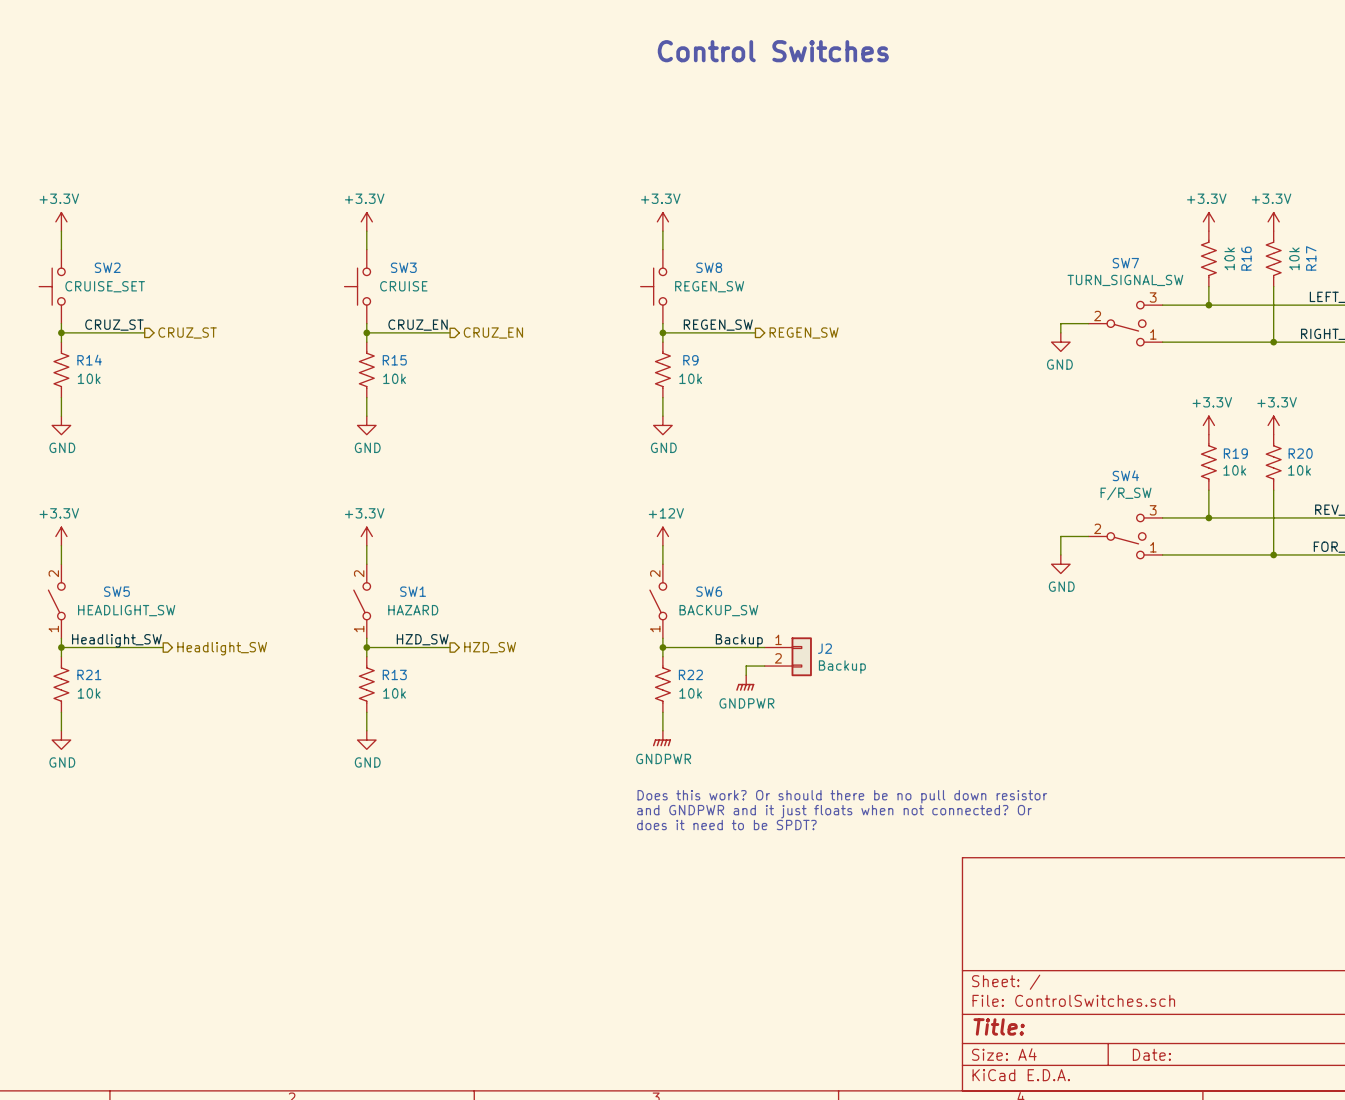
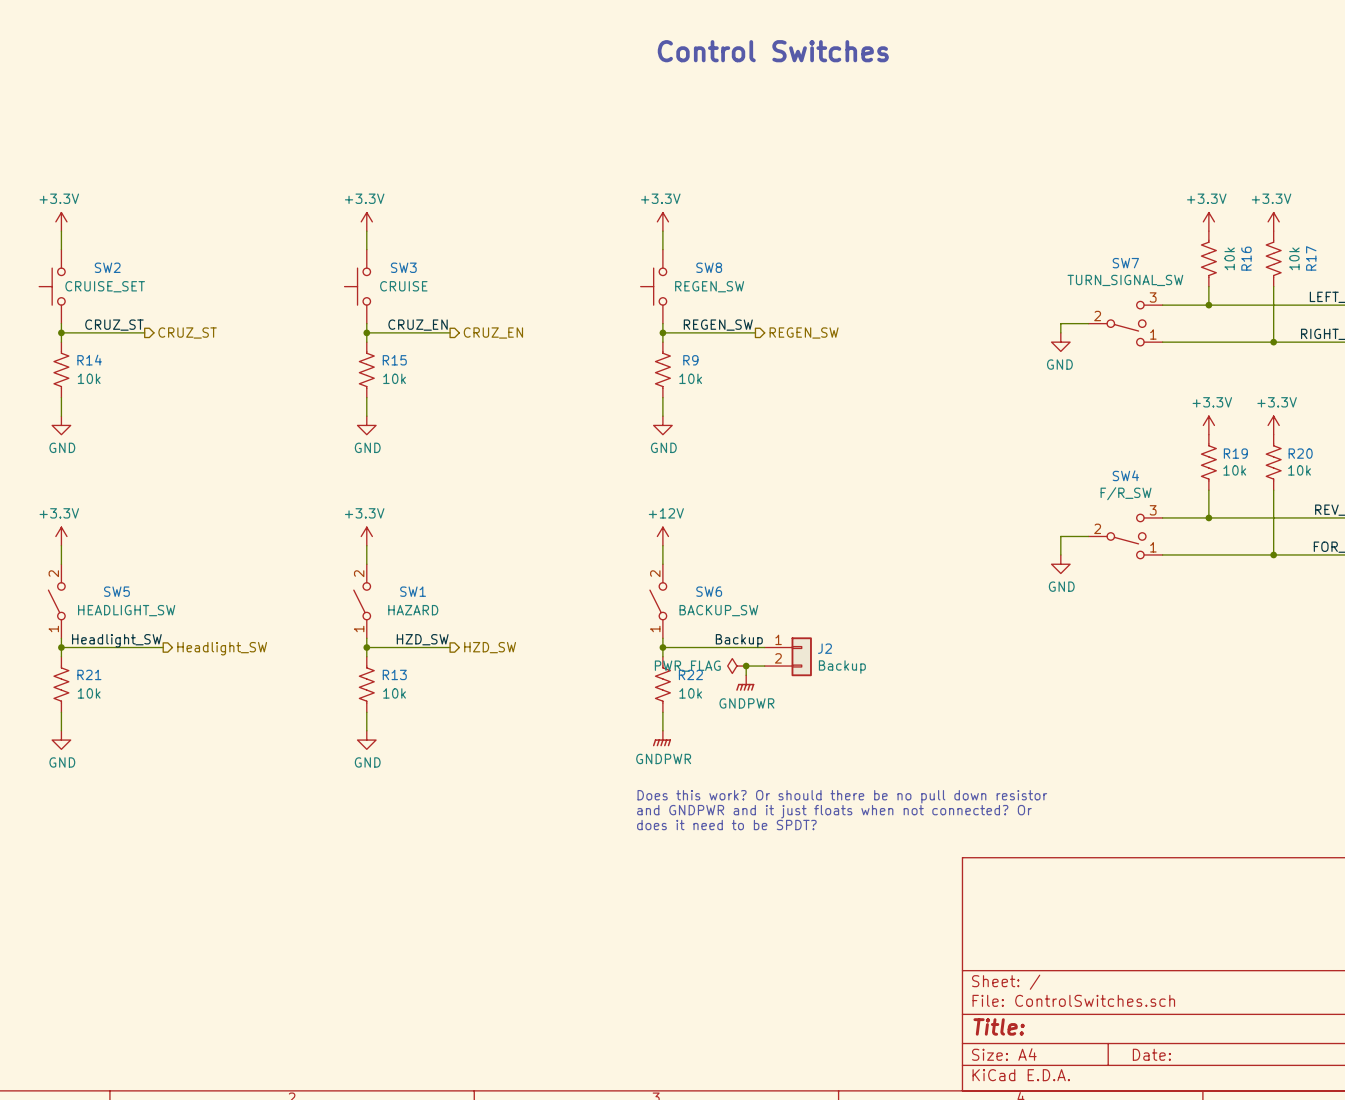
power symbol: none -> PWR_FLAG (736, 666)
junction: none -> (746, 666)

